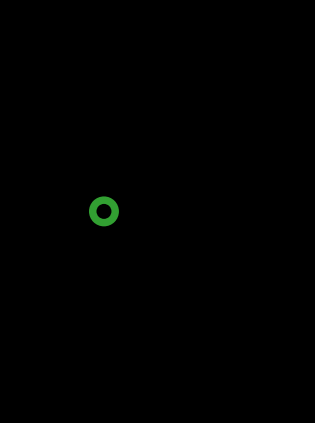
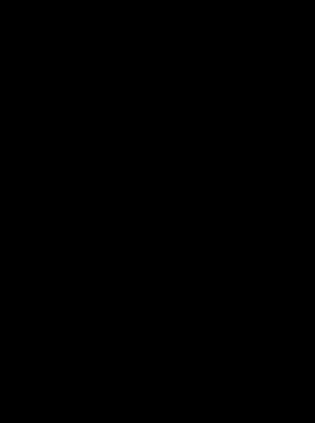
via: (103, 211) -> none

